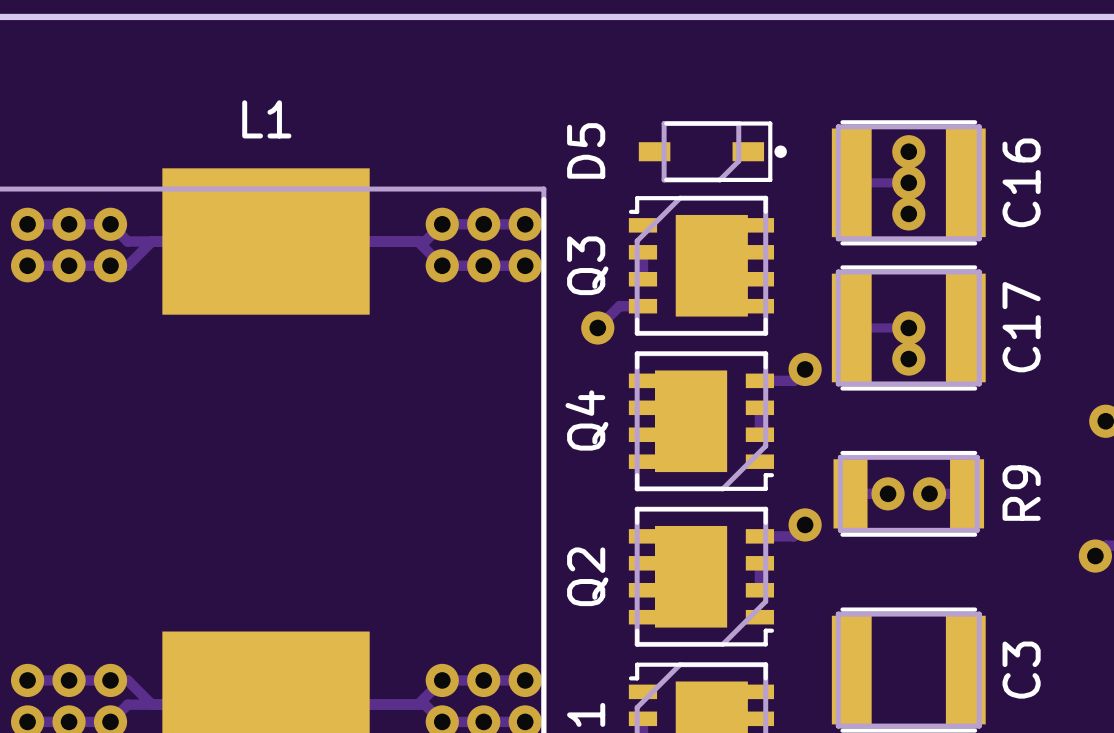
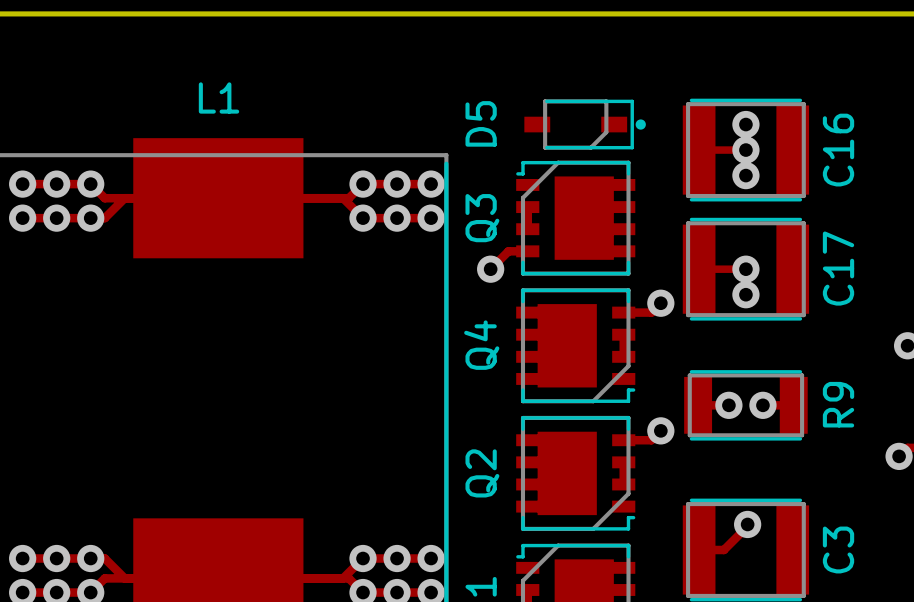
track: none -> (747, 524) (723, 549) (699, 549)
via: none -> (747, 524)

